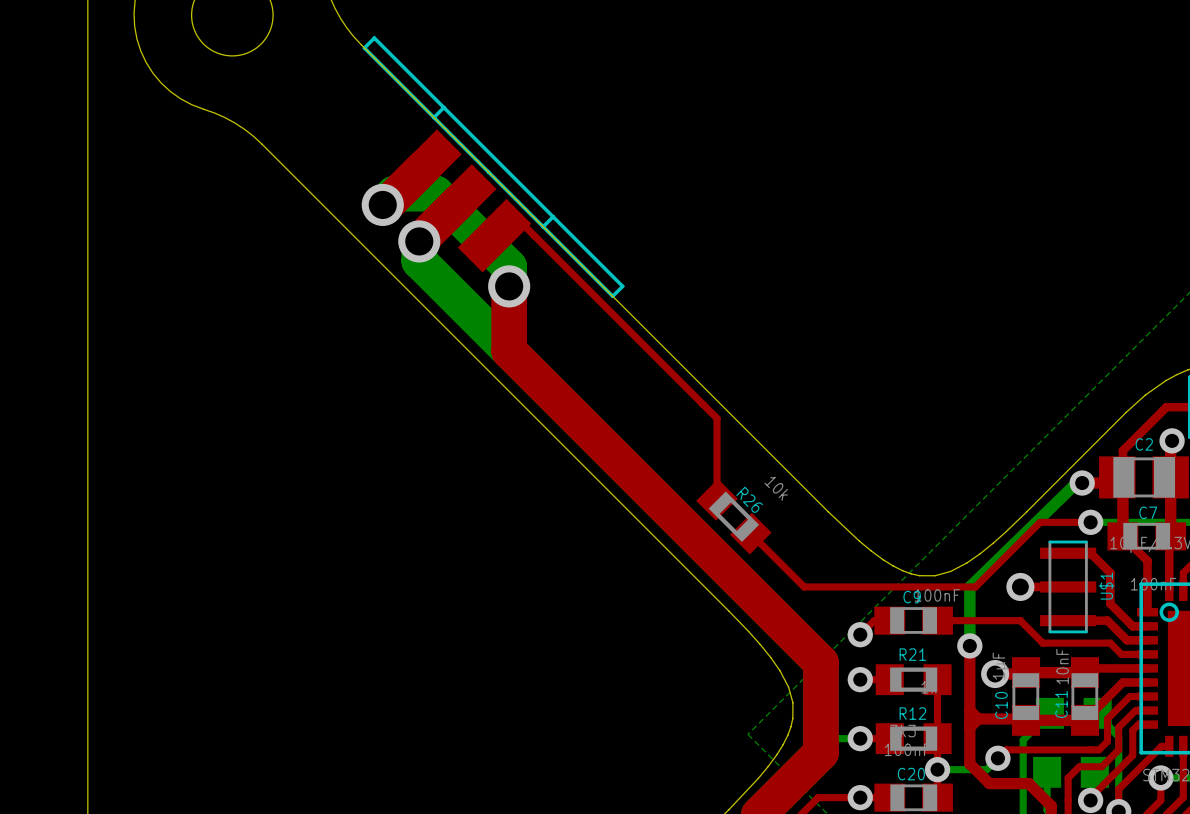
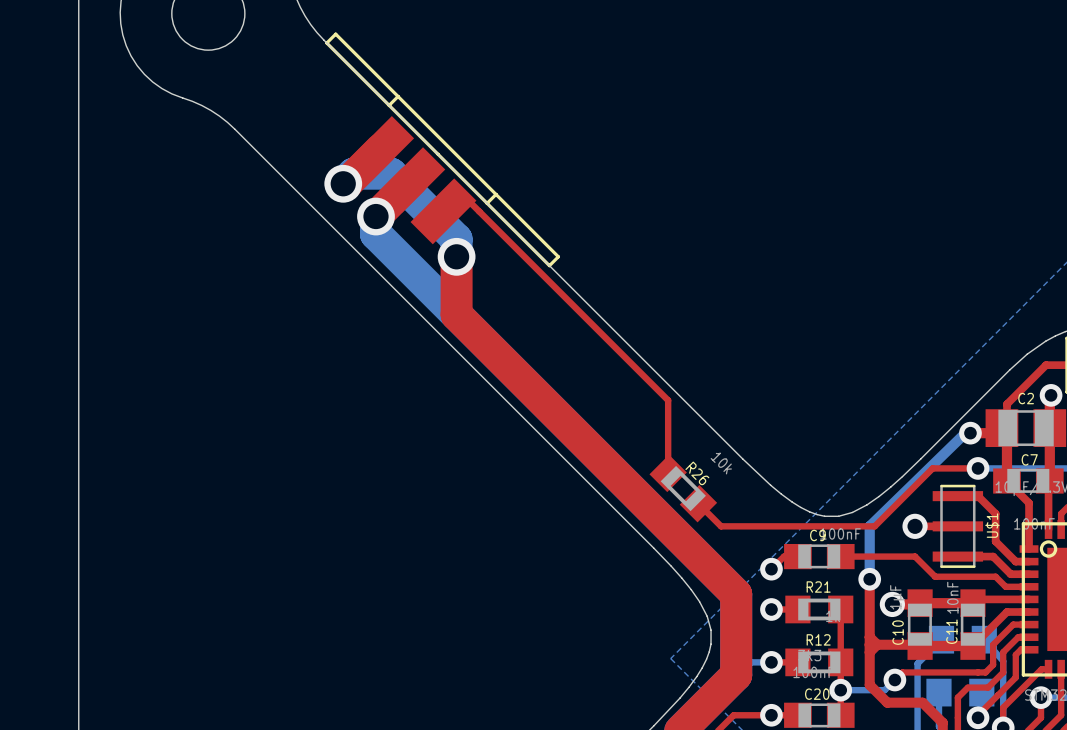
top track: (717, 418) (717, 499) -> (642, 375) (668, 400) (668, 473)
R26 position: (733, 516) -> (683, 488)
top track: (750, 533) (778, 561) -> none

